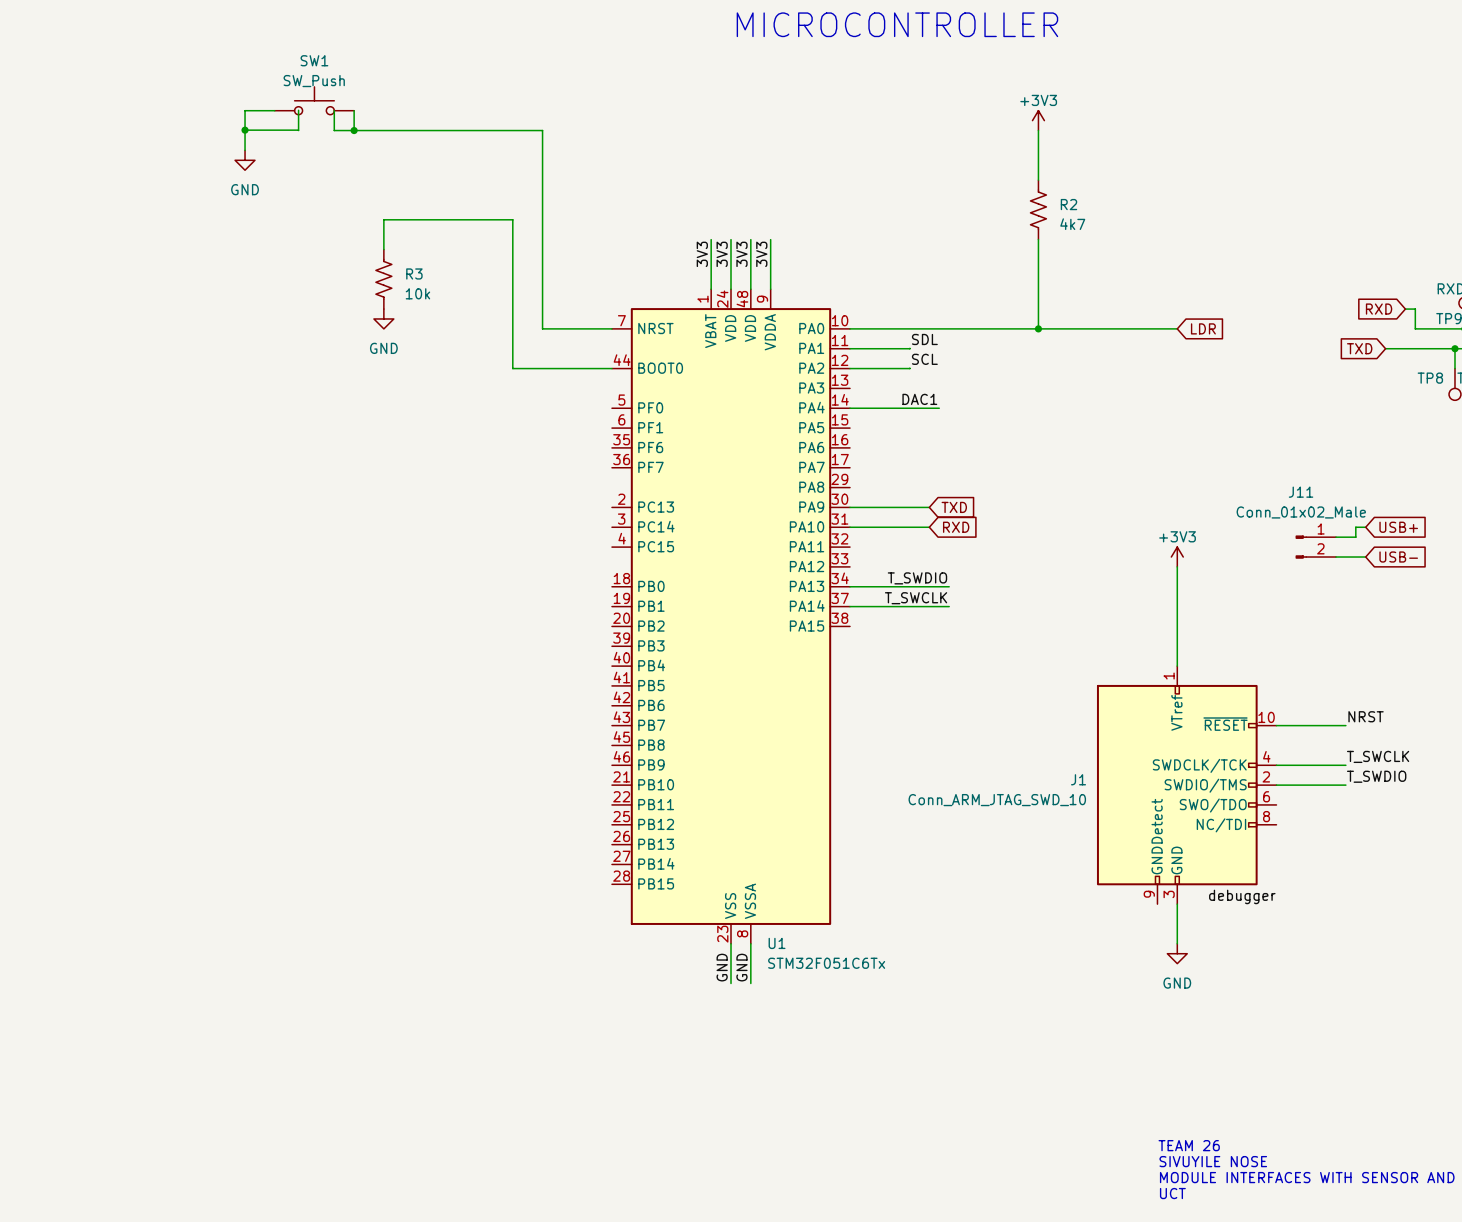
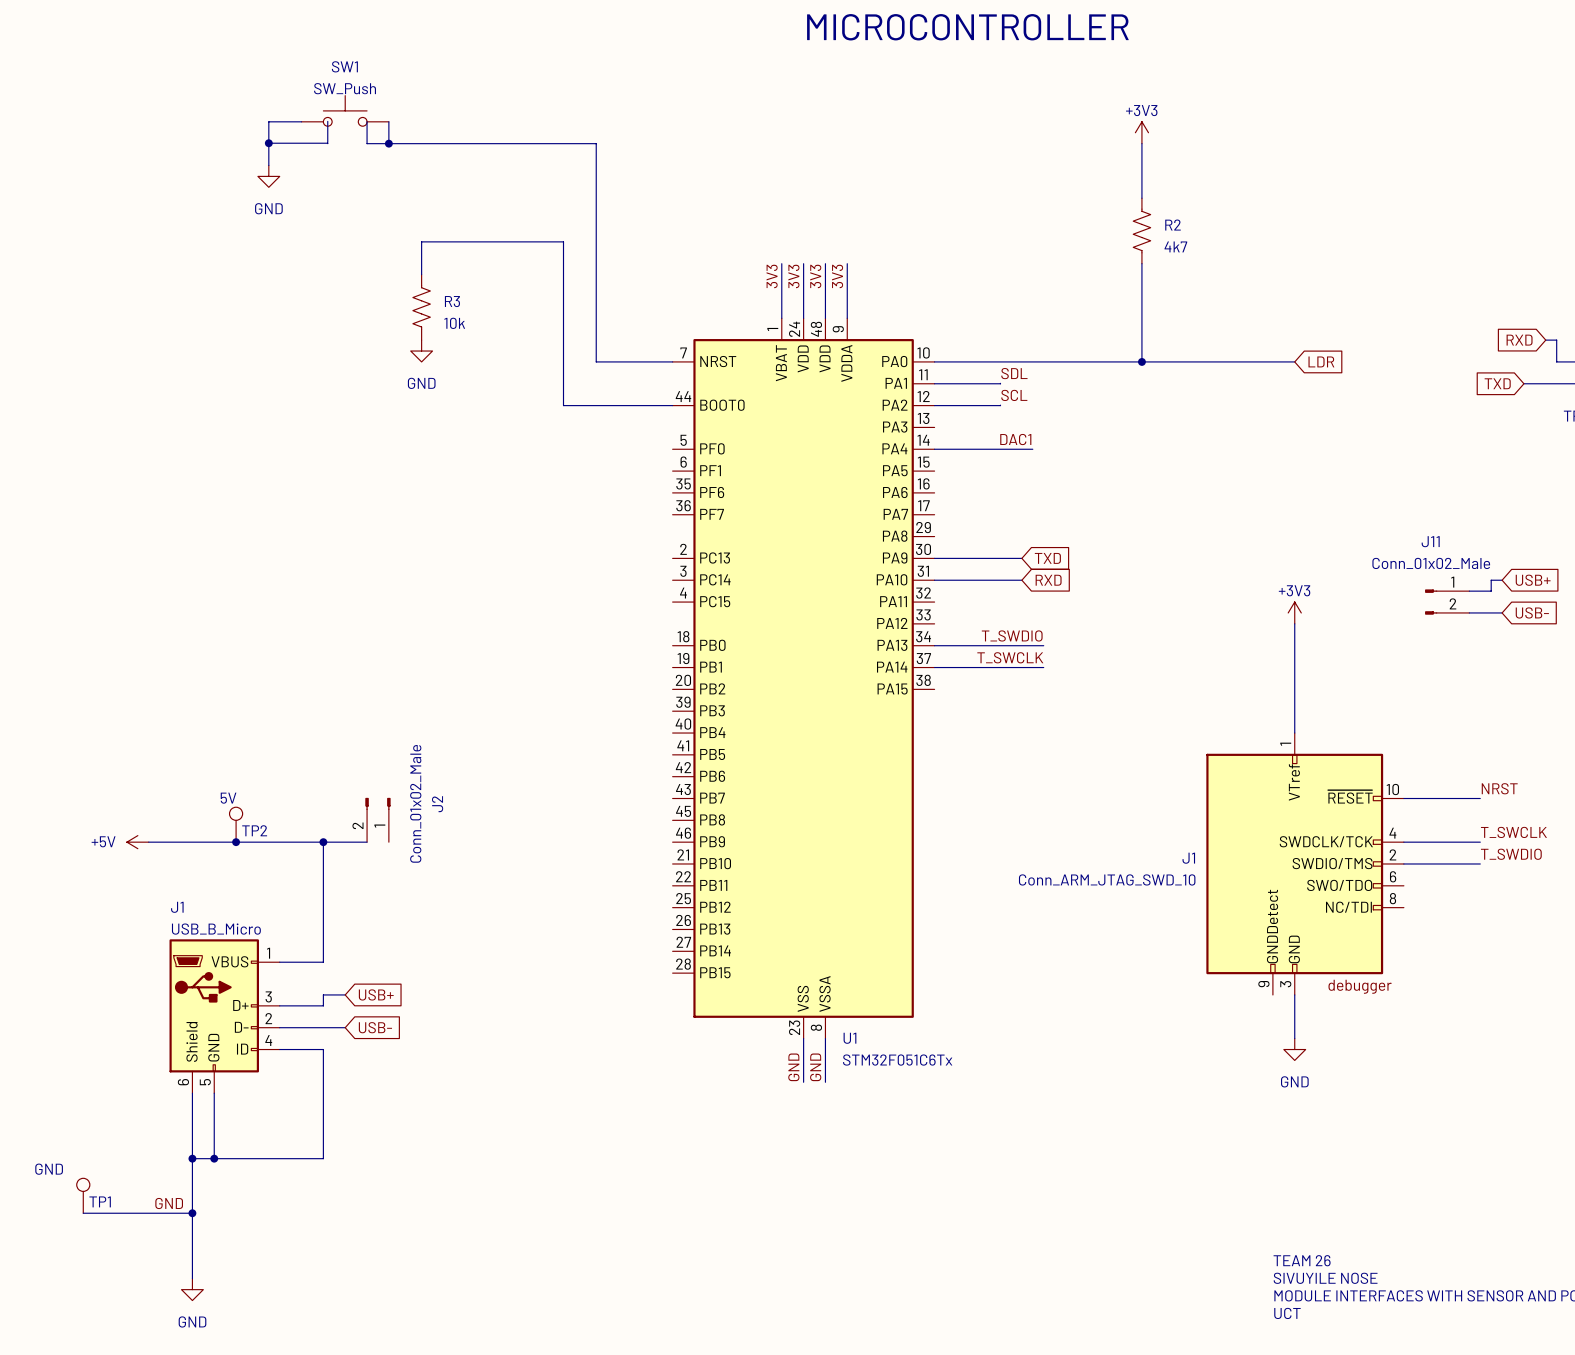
J2: none -> Conn_01x02_Male (377, 820)
TP2: none -> 5V (236, 824)
power symbol: none -> +5V (137, 842)
wire: none -> (148, 842) (367, 842)
junction: none -> (236, 842)
wire: none -> (323, 842) (323, 962) (279, 962)
junction: none -> (323, 842)
wire: none -> (345, 994) (323, 994) (323, 1005) (279, 1005)
global label: none -> USB+ (376, 994)
J1: none -> USB_B_Micro (224, 1016)
wire: none -> (279, 1027) (345, 1027)
global label: none -> USB- (375, 1027)
wire: none -> (279, 1049) (323, 1049) (323, 1158) (192, 1158)
wire: none -> (192, 1093) (192, 1278)
wire: none -> (214, 1093) (214, 1158)
junction: none -> (192, 1158)
junction: none -> (214, 1158)
TP1: none -> GND (83, 1195)
label: none -> GND (169, 1203)
wire: none -> (83, 1213) (192, 1213)
junction: none -> (192, 1213)
power symbol: none -> GND (192, 1289)

